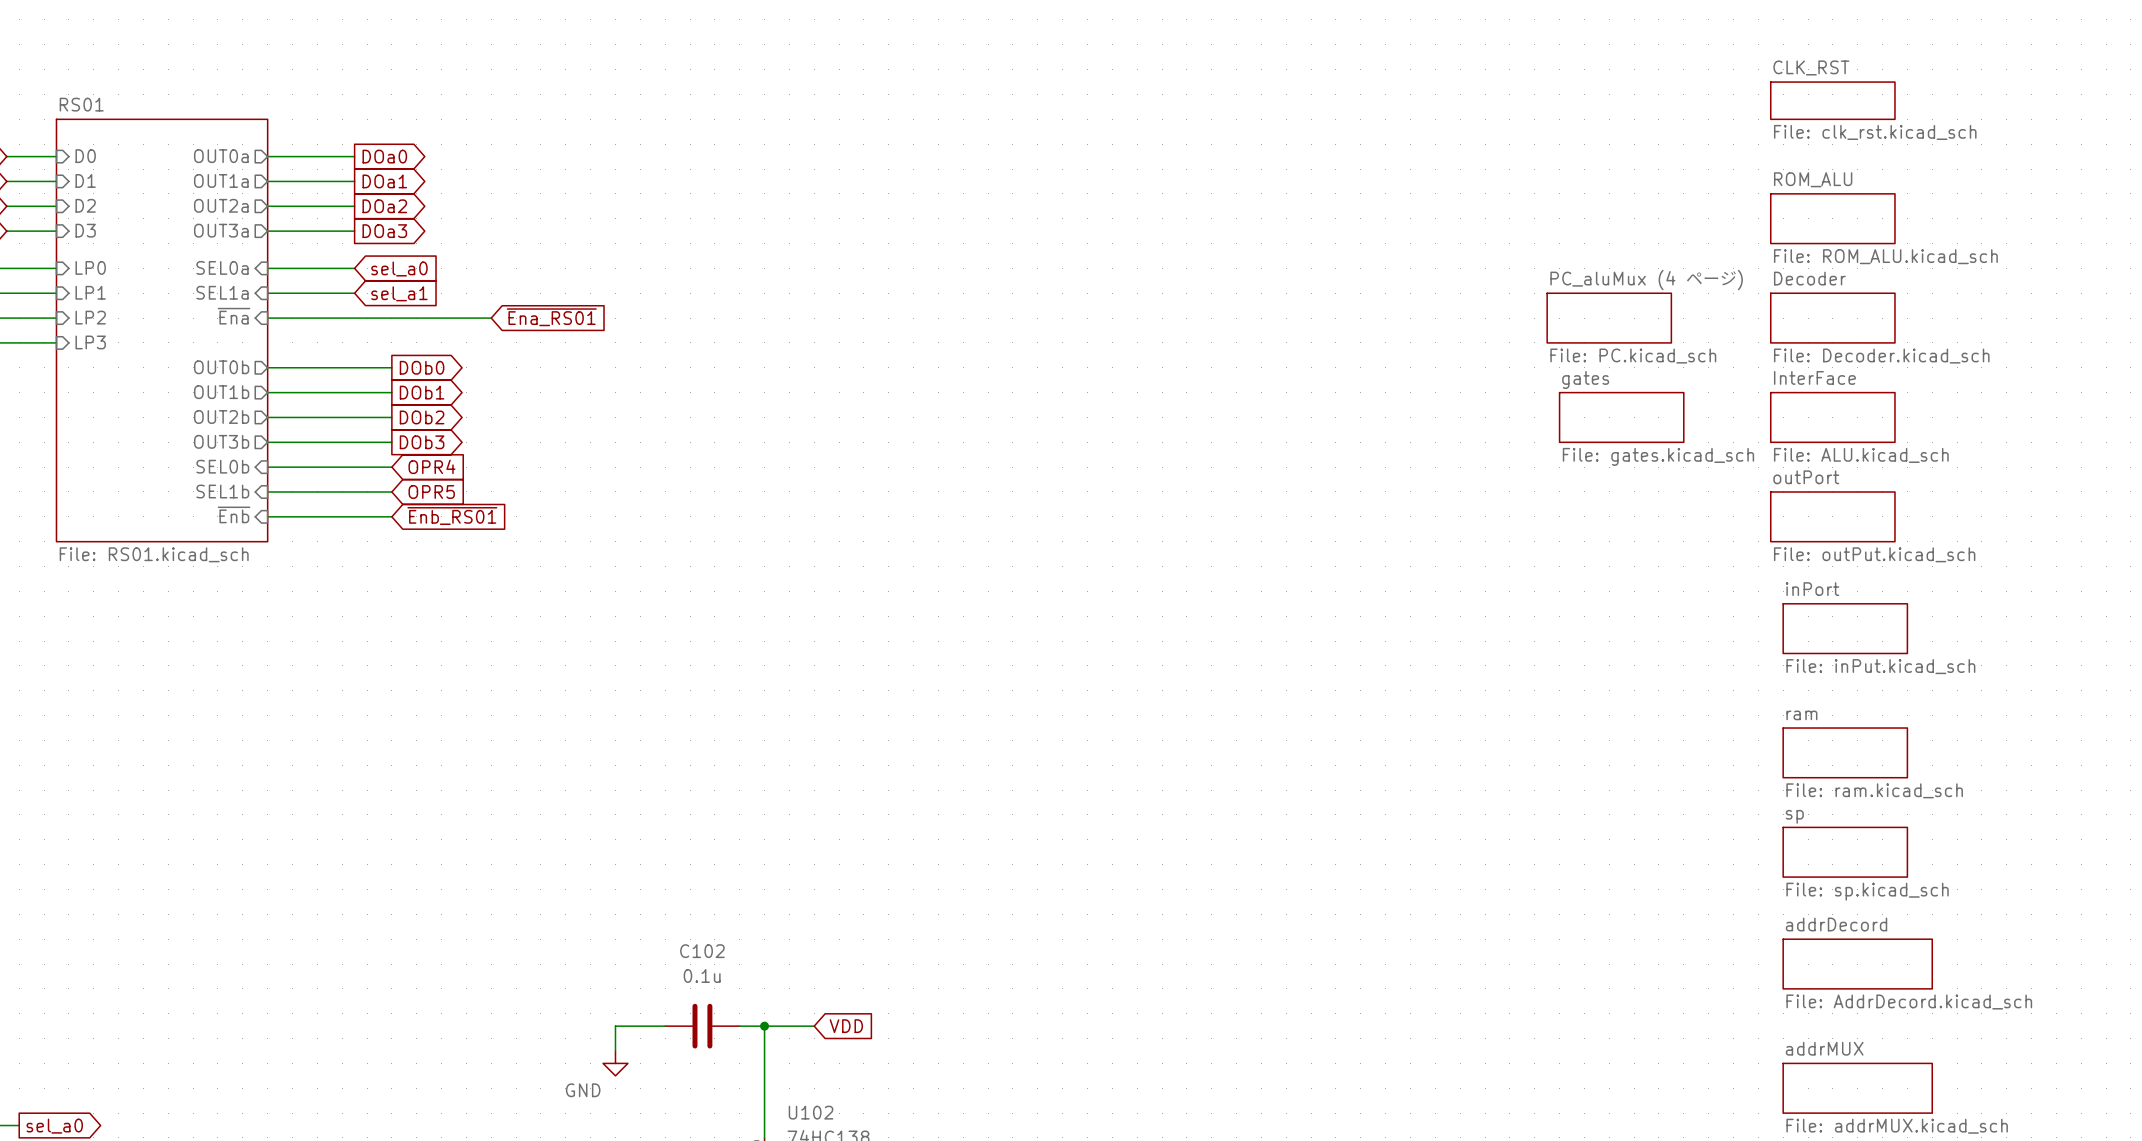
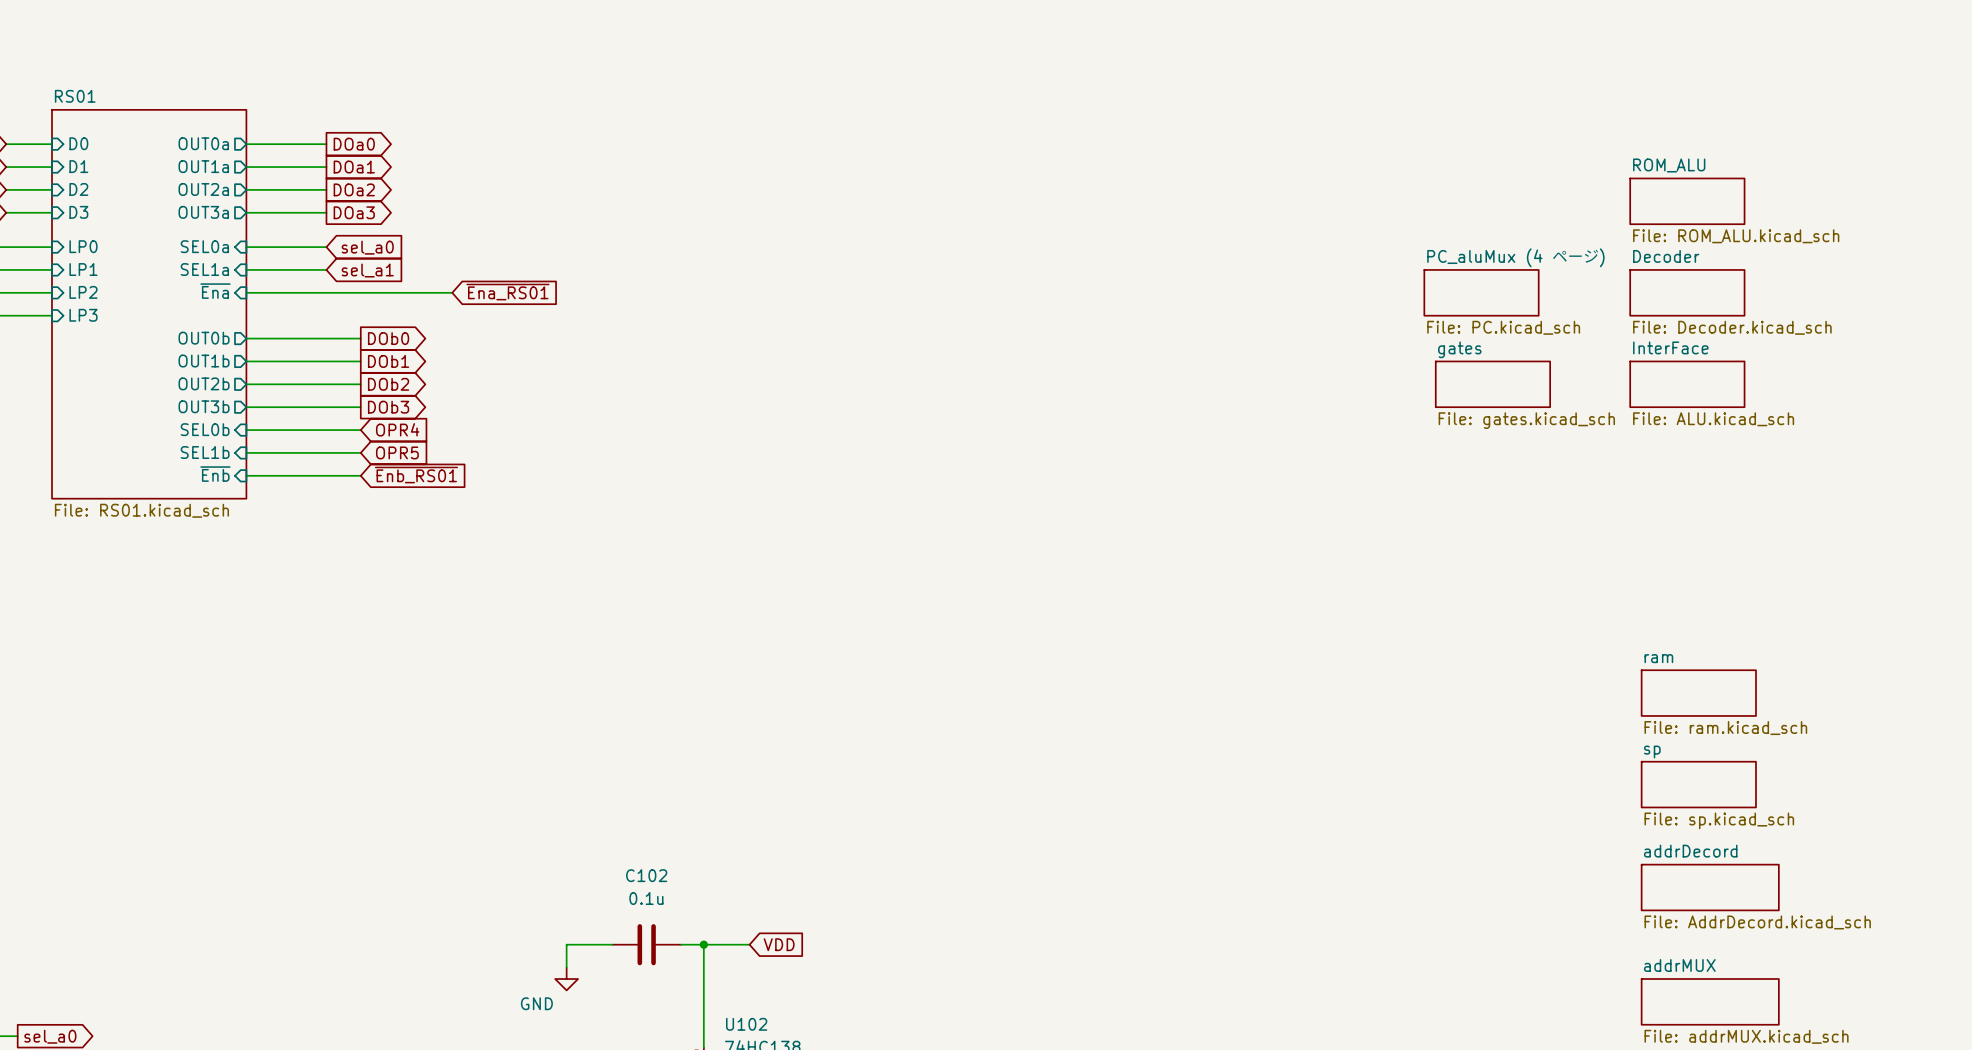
sheet CLK_RST: File: clk_rst.kicad_sch (1832, 100) -> none
sheet outPort: File: outPut.kicad_sch (1832, 516) -> none
sheet inPort: File: inPut.kicad_sch (1845, 628) -> none

